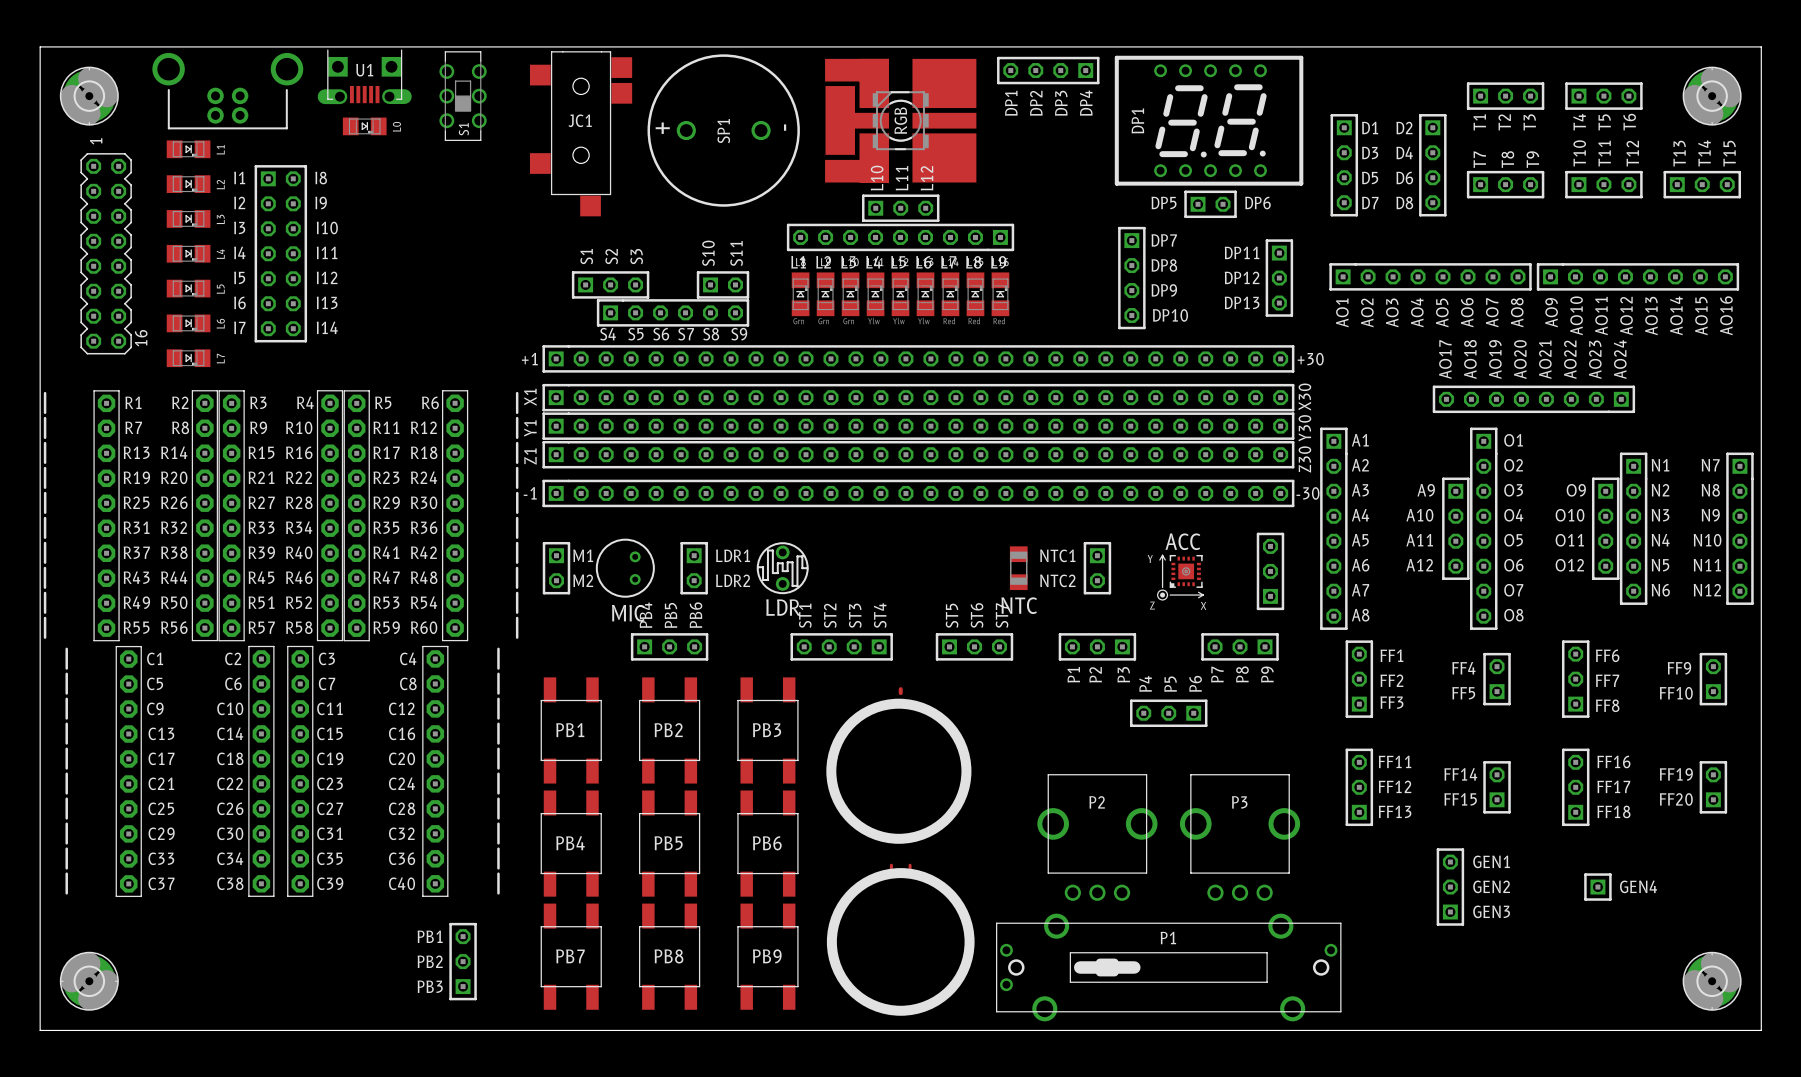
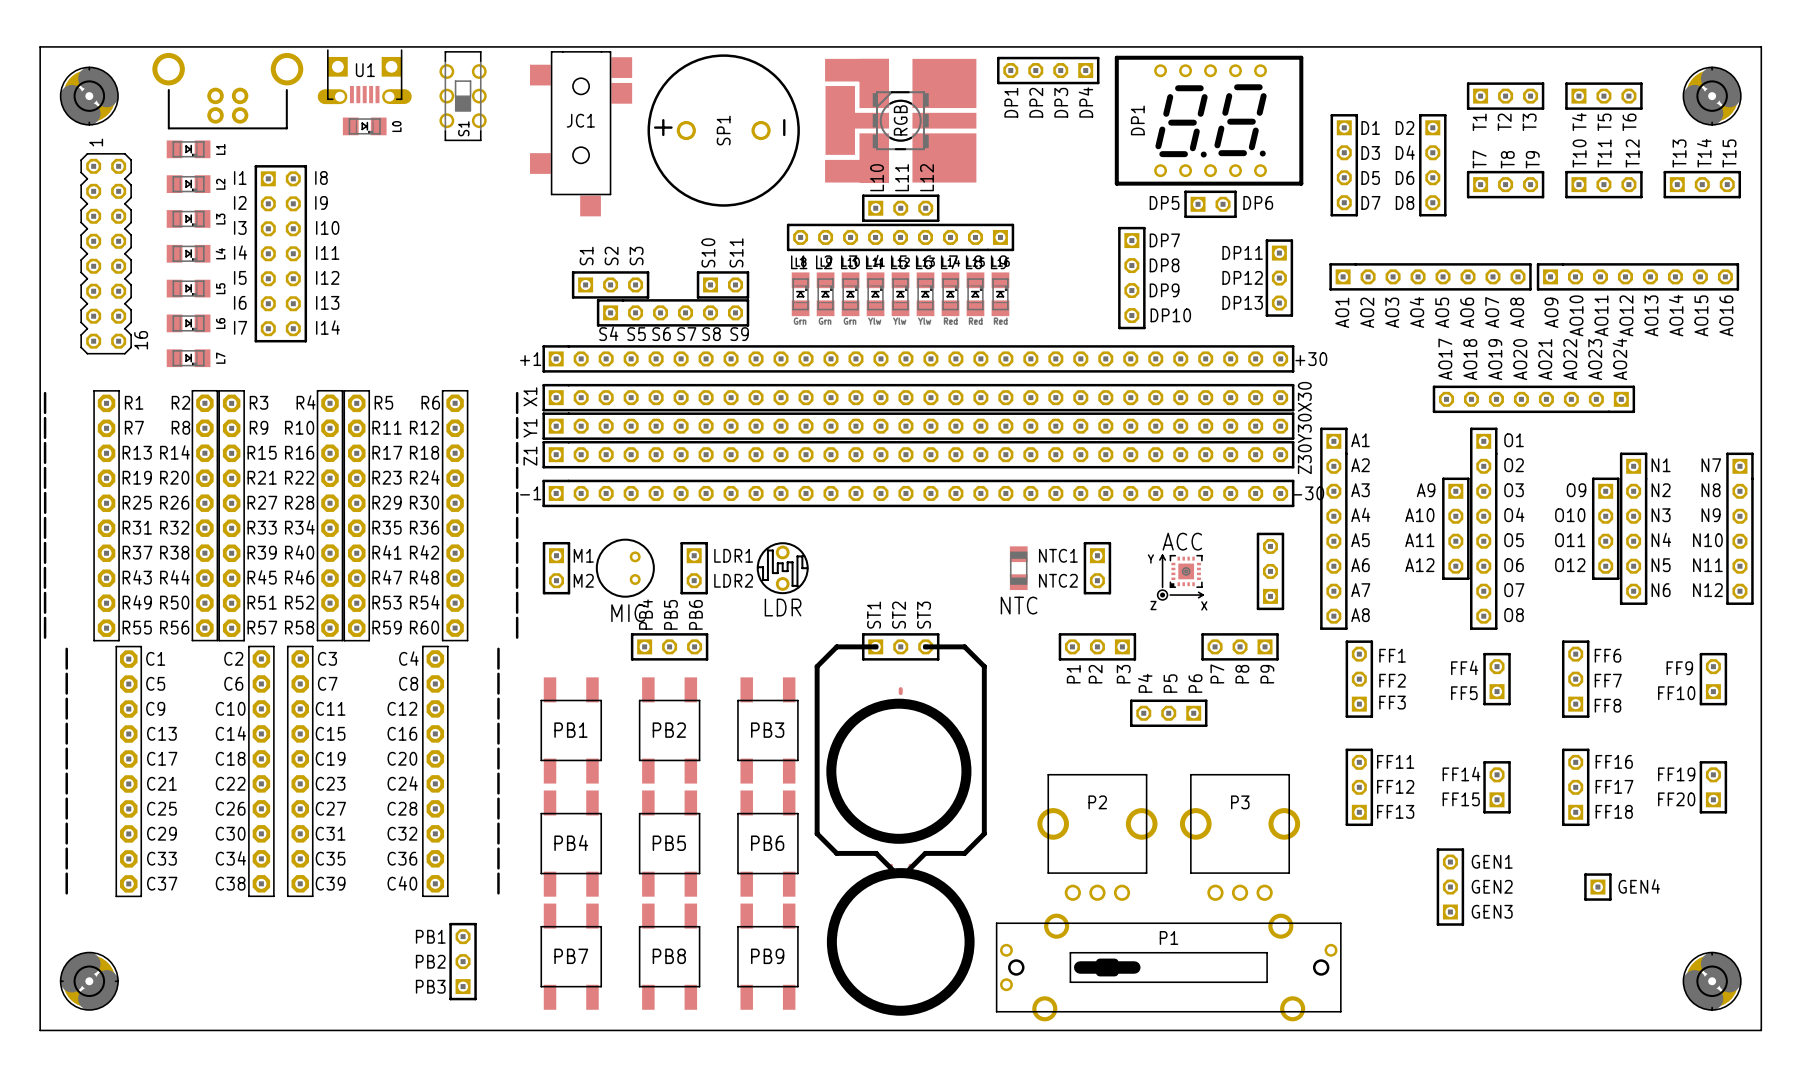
text: ST1 (805, 615) -> none
text position: ST2 (830, 615) -> ST2 (899, 615)
text position: ST3 (855, 615) -> ST3 (924, 615)
text: ST4 (880, 615) -> ST1 (874, 615)
text: ST5 (952, 615) -> none
text: ST6 (977, 615) -> none
text: ST7 (1002, 615) -> none
part: (841, 646) -> none
line: none -> (876, 646) (836, 646) (817, 666) (817, 833) (836, 853) (876, 853) (895, 873)
line: none -> (925, 646) (964, 646) (984, 666) (984, 833) (964, 853) (925, 853) (905, 873)
part position: (974, 646) -> (900, 646)

